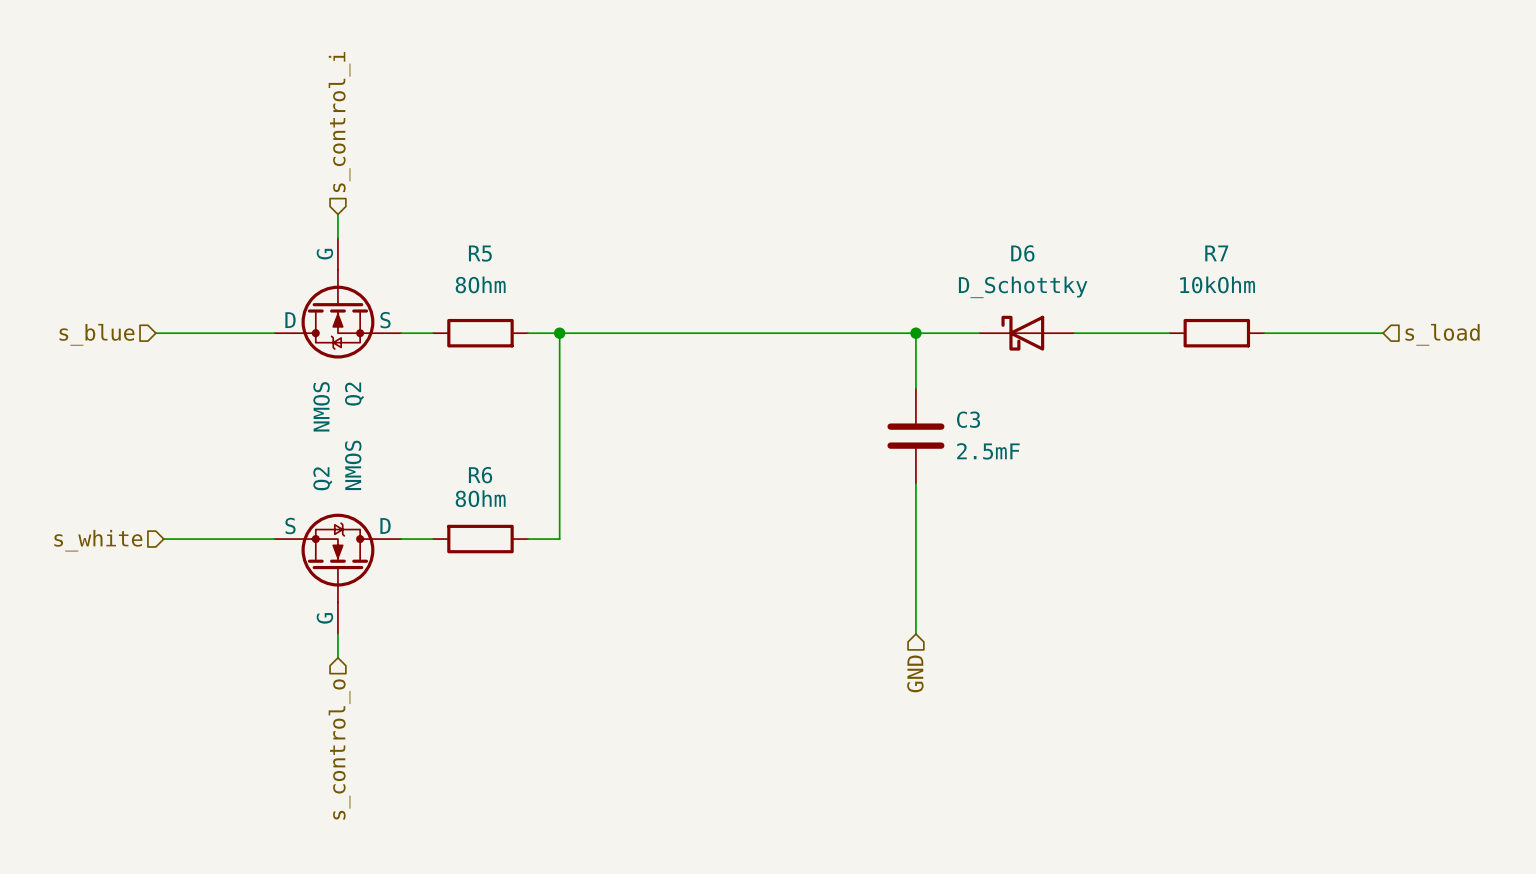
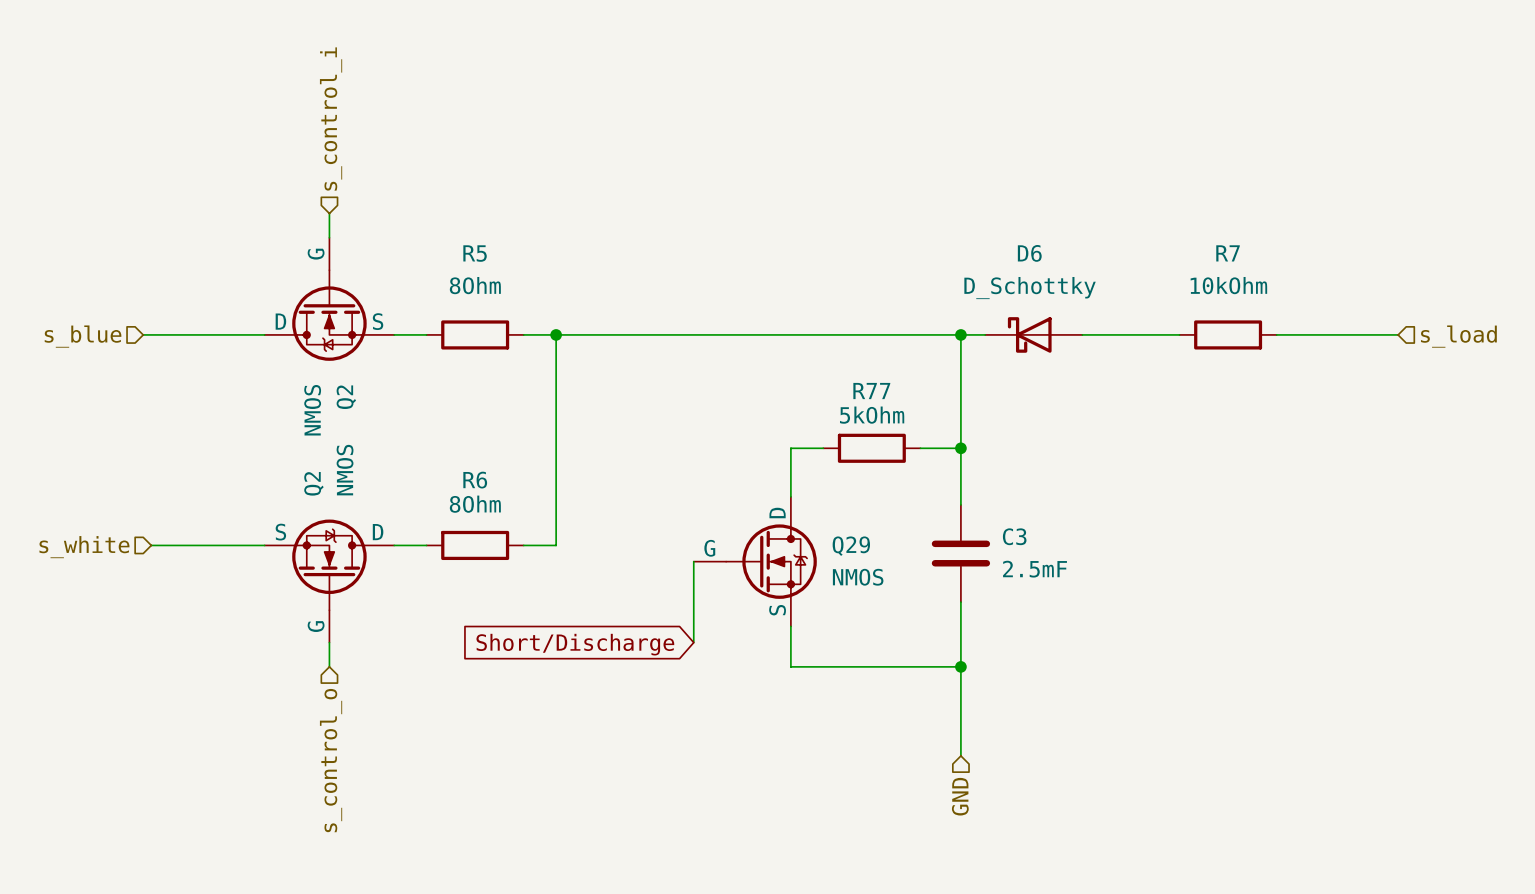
wire: (915, 333) (915, 388) -> none
junction position: (915, 333) -> (960, 334)
wire: none -> (960, 334) (960, 504)
C3 position: (915, 436) -> (960, 553)
wire: none -> (823, 448) (790, 448) (790, 496)
R77: none -> 5kOhm (871, 448)
junction: none -> (960, 448)
wire: (915, 483) (915, 634) -> (960, 602) (960, 755)
wire: none -> (693, 561) (693, 642)
Q29: none -> NMOS (755, 561)
wire: none -> (790, 626) (790, 666) (960, 666)
global label: none -> Short/Discharge (575, 644)
junction: none -> (960, 666)
hierarchical label position: GND (915, 673) -> GND (960, 796)

